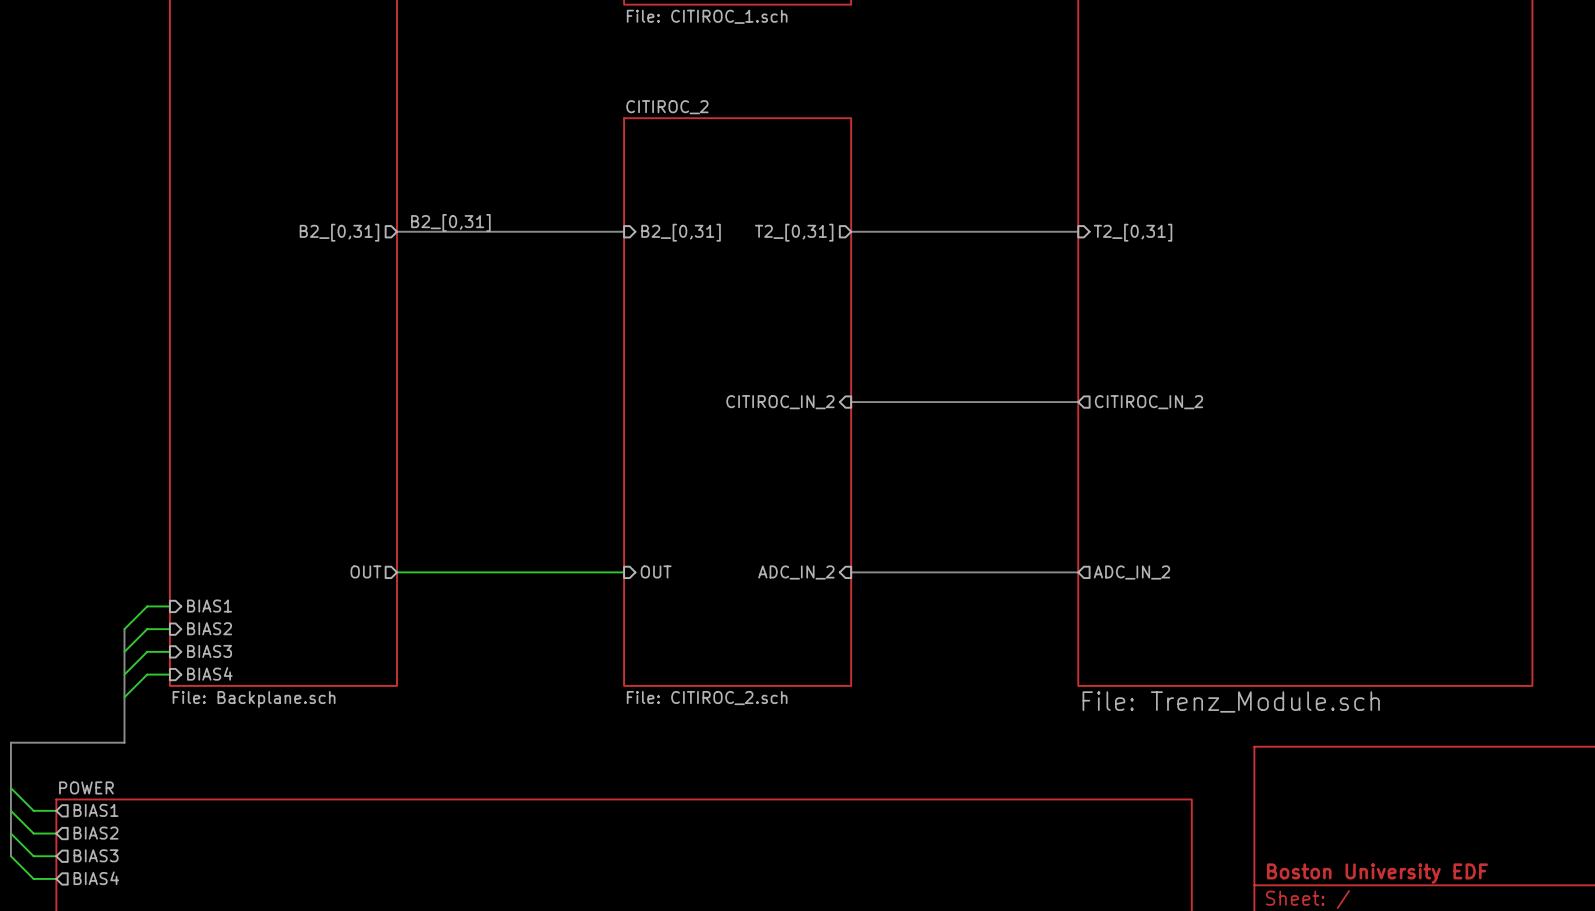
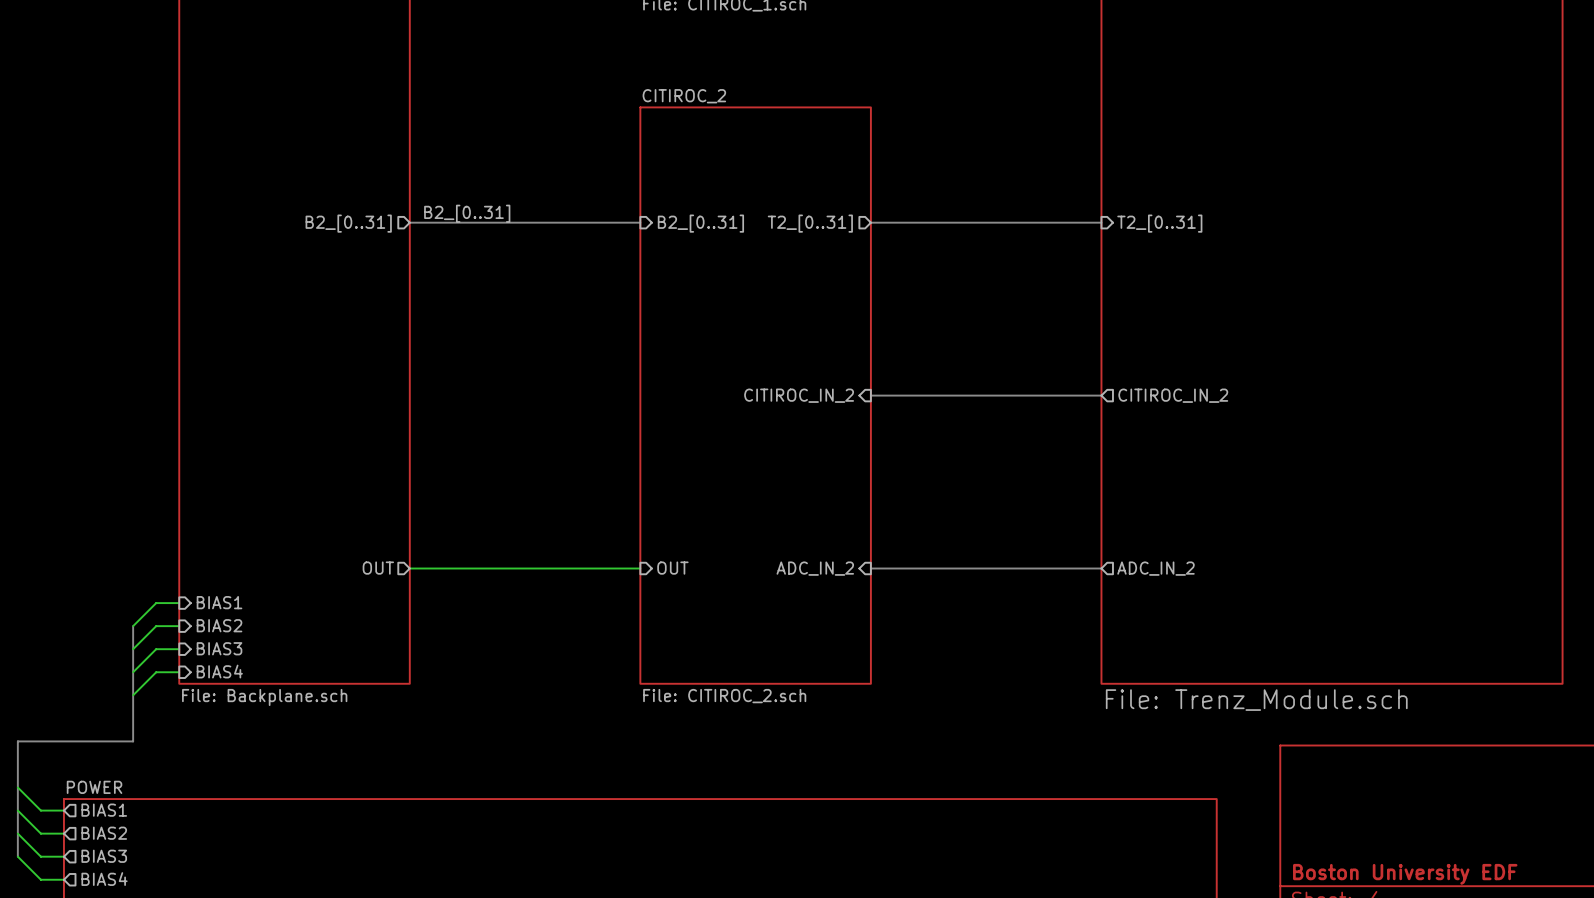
label: B2_[0,31] (450, 222) -> B2_[0..31] (467, 213)
sheet pin: B2_[0,31] (339, 232) -> B2_[0..31] (348, 223)
sheet pin: B2_[0,31] (681, 232) -> B2_[0..31] (700, 223)
sheet pin: T2_[0,31] (794, 232) -> T2_[0..31] (810, 223)
sheet pin: T2_[0,31] (1133, 232) -> T2_[0..31] (1159, 223)

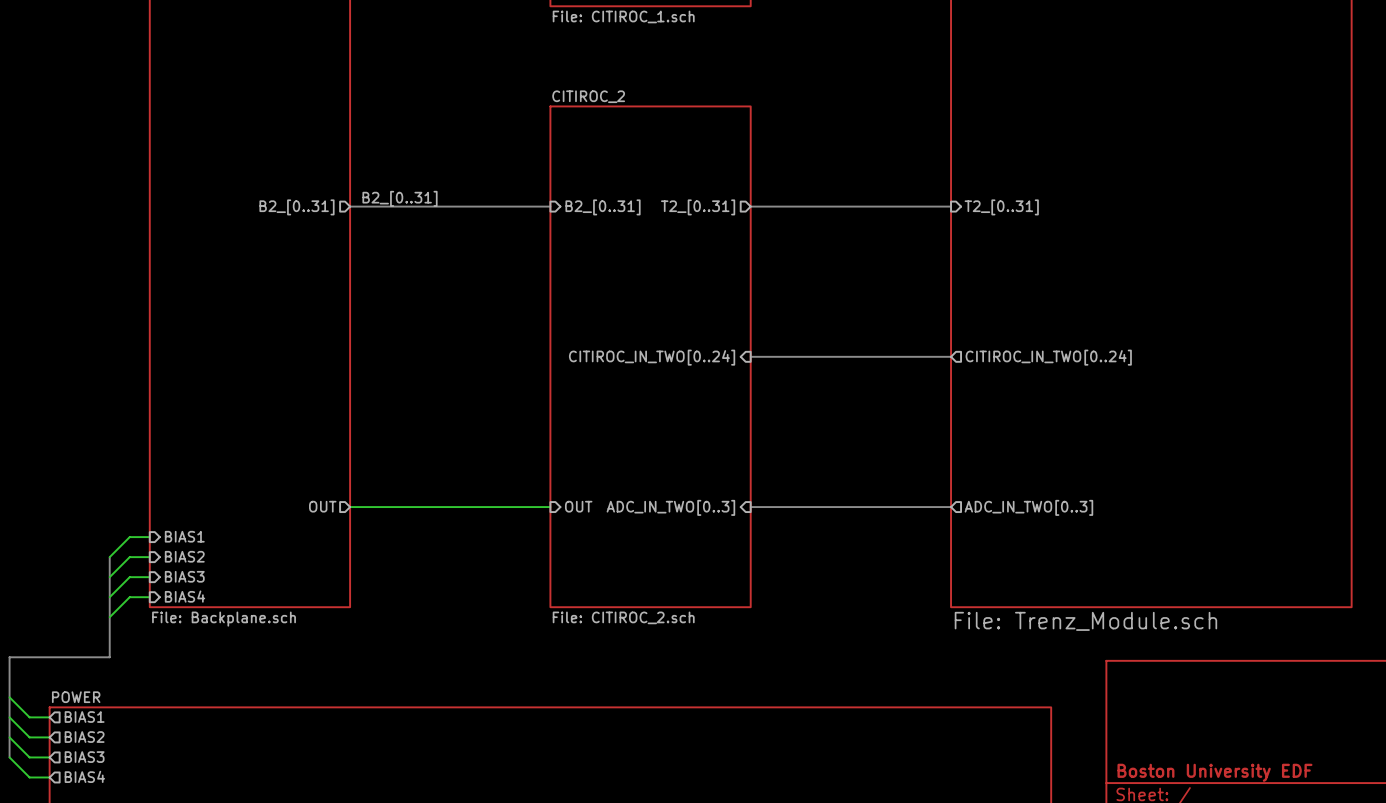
sheet pin: CITIROC_IN_2 (799, 395) -> CITIROC_IN_TWO[0..24] (652, 357)
sheet pin: CITIROC_IN_2 (1173, 395) -> CITIROC_IN_TWO[0..24] (1048, 357)
sheet pin: ADC_IN_2 (815, 568) -> ADC_IN_TWO[0..3] (670, 507)
sheet pin: ADC_IN_2 (1155, 568) -> ADC_IN_TWO[0..3] (1028, 507)

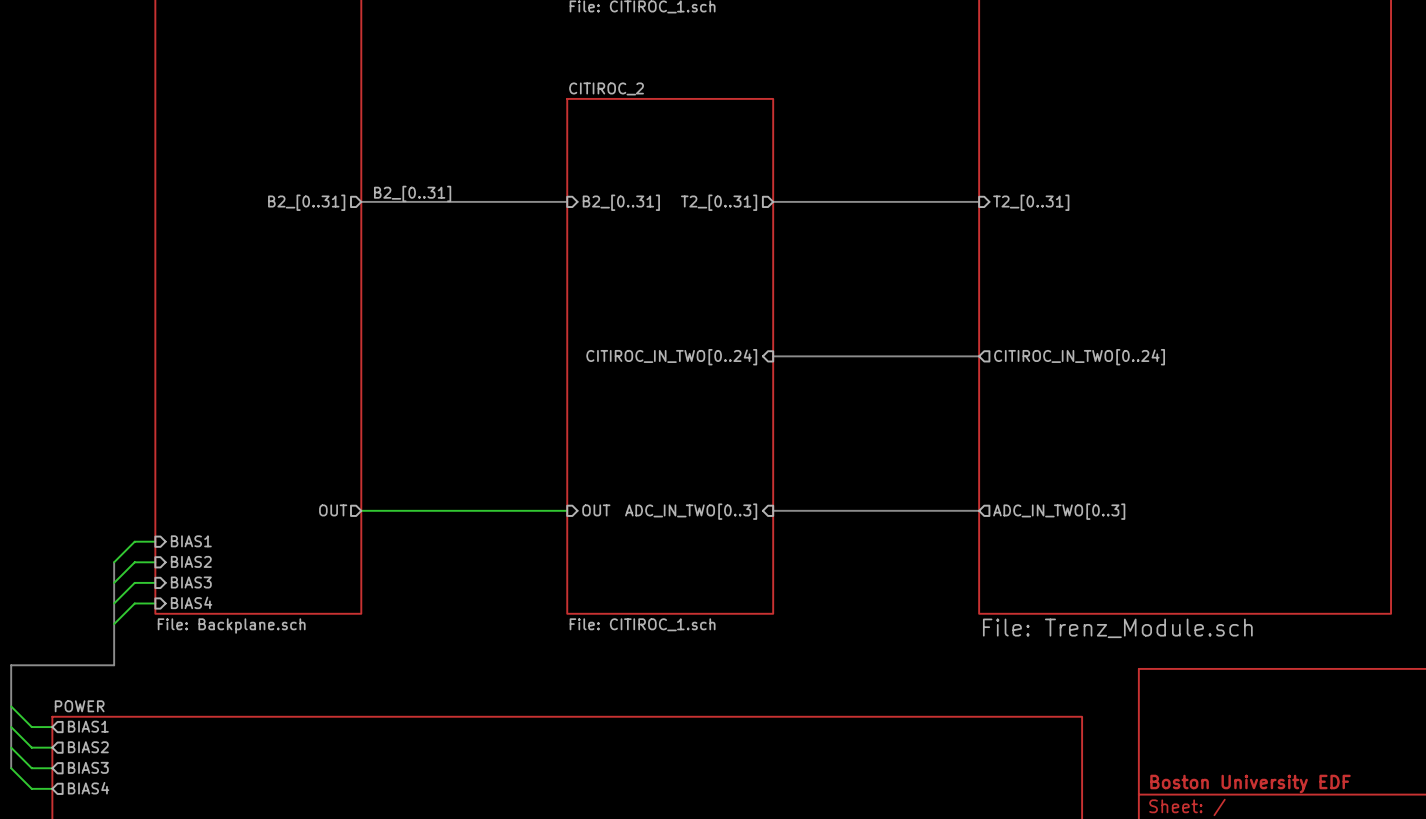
sheet CITIROC_2 value: File: CITIROC_2.sch (623, 617) -> File: CITIROC_1.sch (642, 624)

